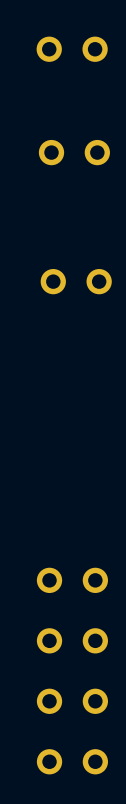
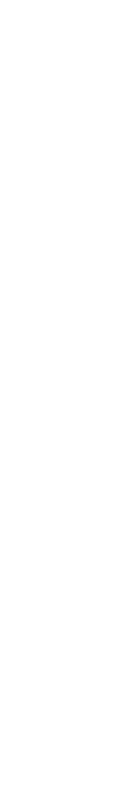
part: (72, 49) -> none
part: (74, 152) -> none
part: (76, 281) -> none
part: (72, 580) -> none
part: (72, 640) -> none
part: (72, 701) -> none
part: (72, 761) -> none

